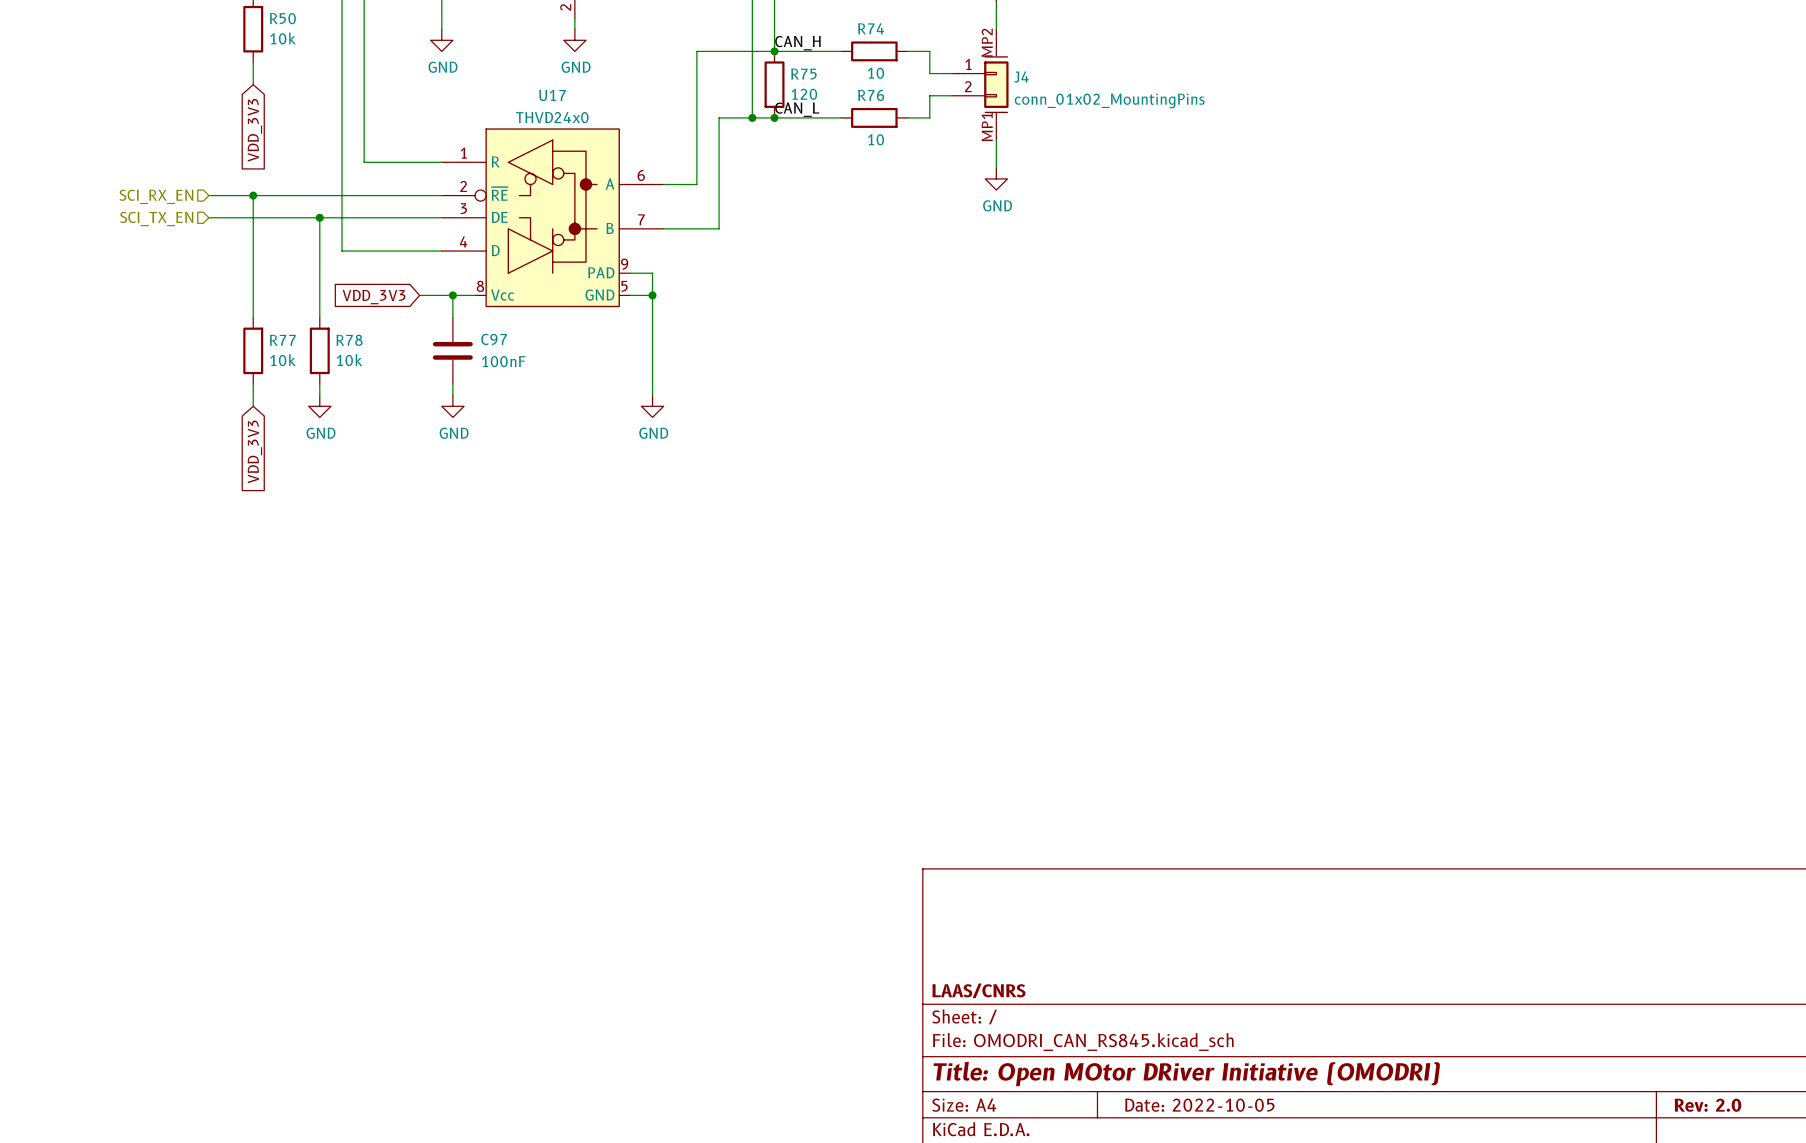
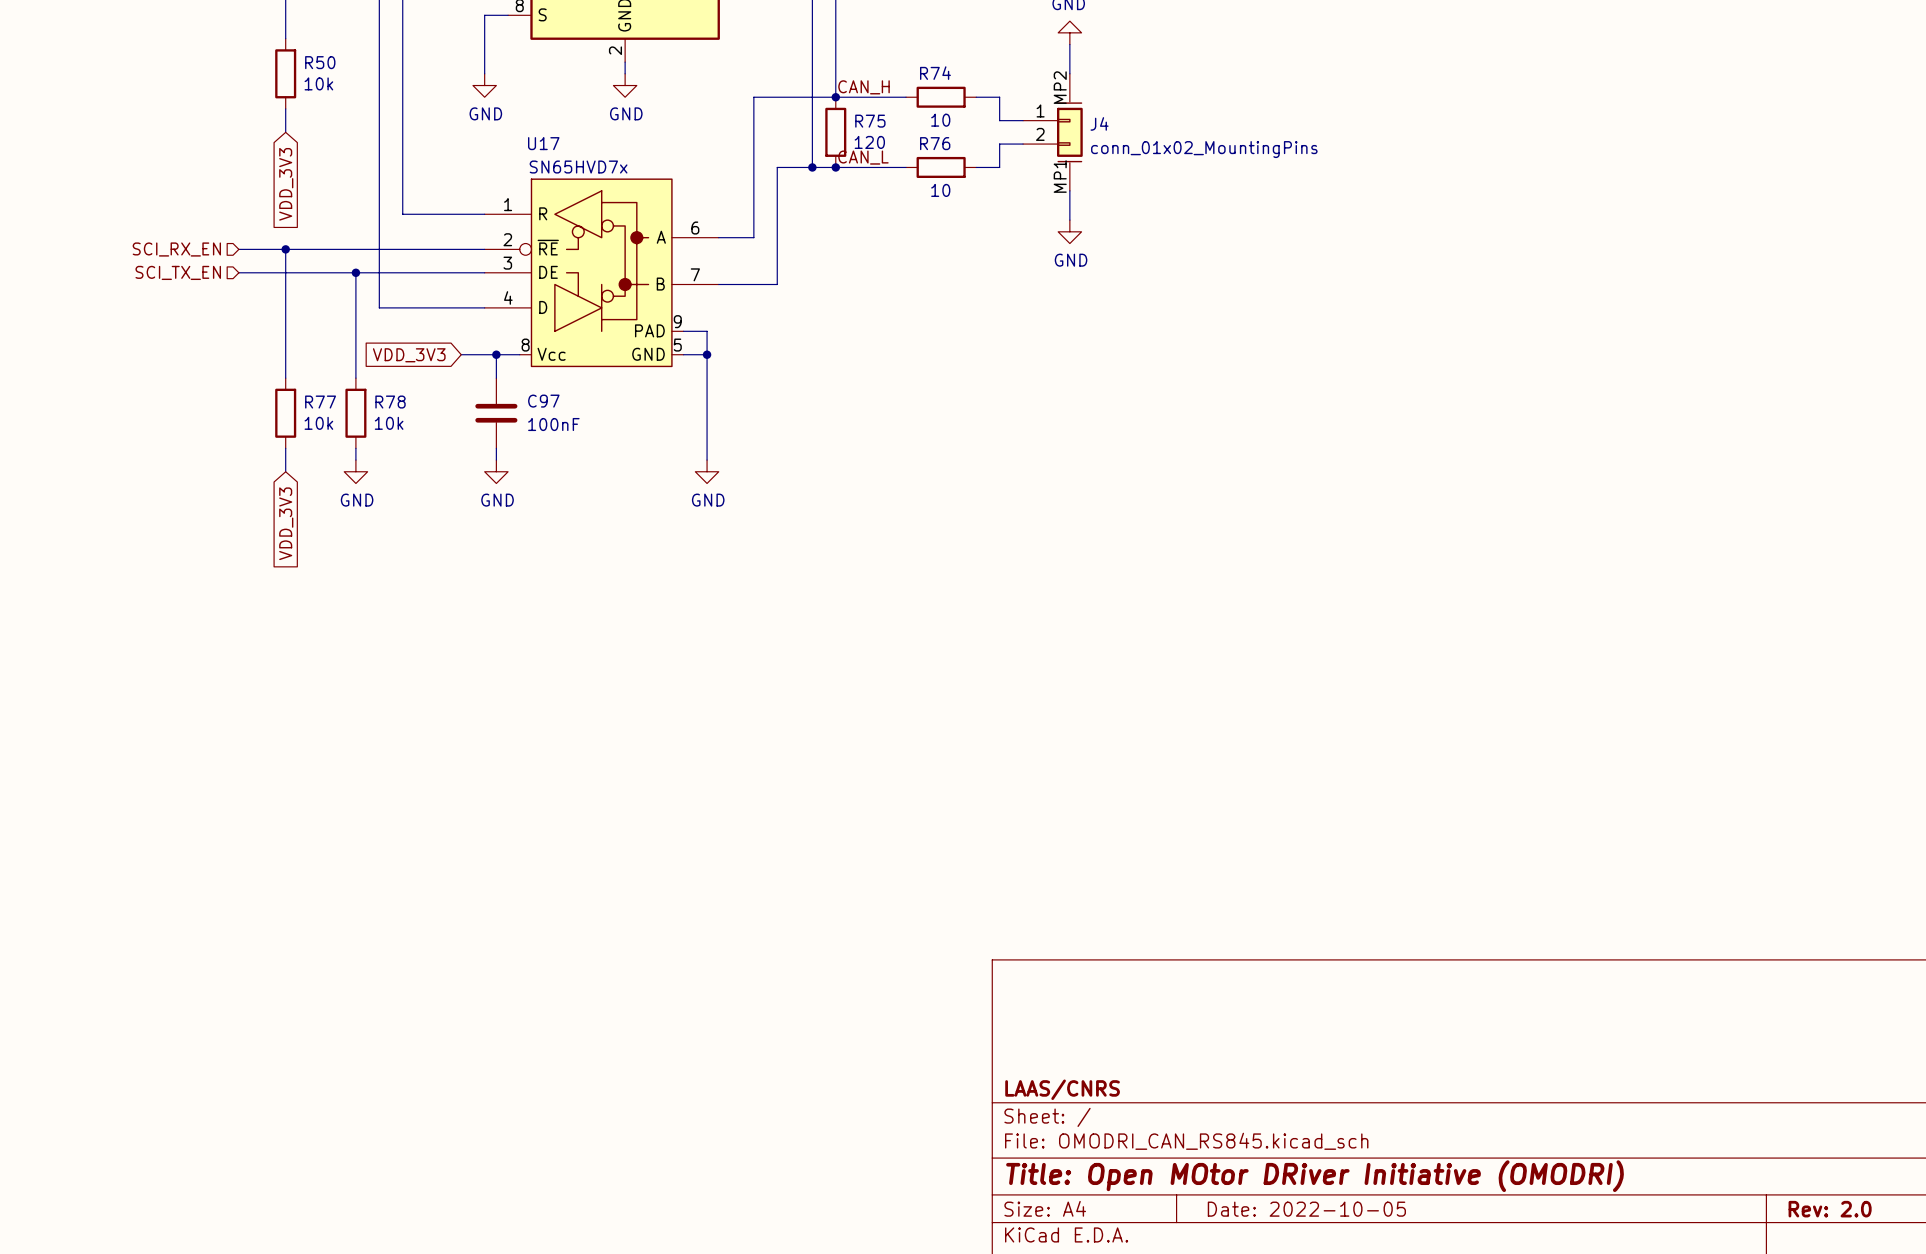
U17 name position: U17 (552, 95) -> U17 (543, 143)
U17 value: THVD24x0 (552, 117) -> SN65HVD7x (578, 167)

